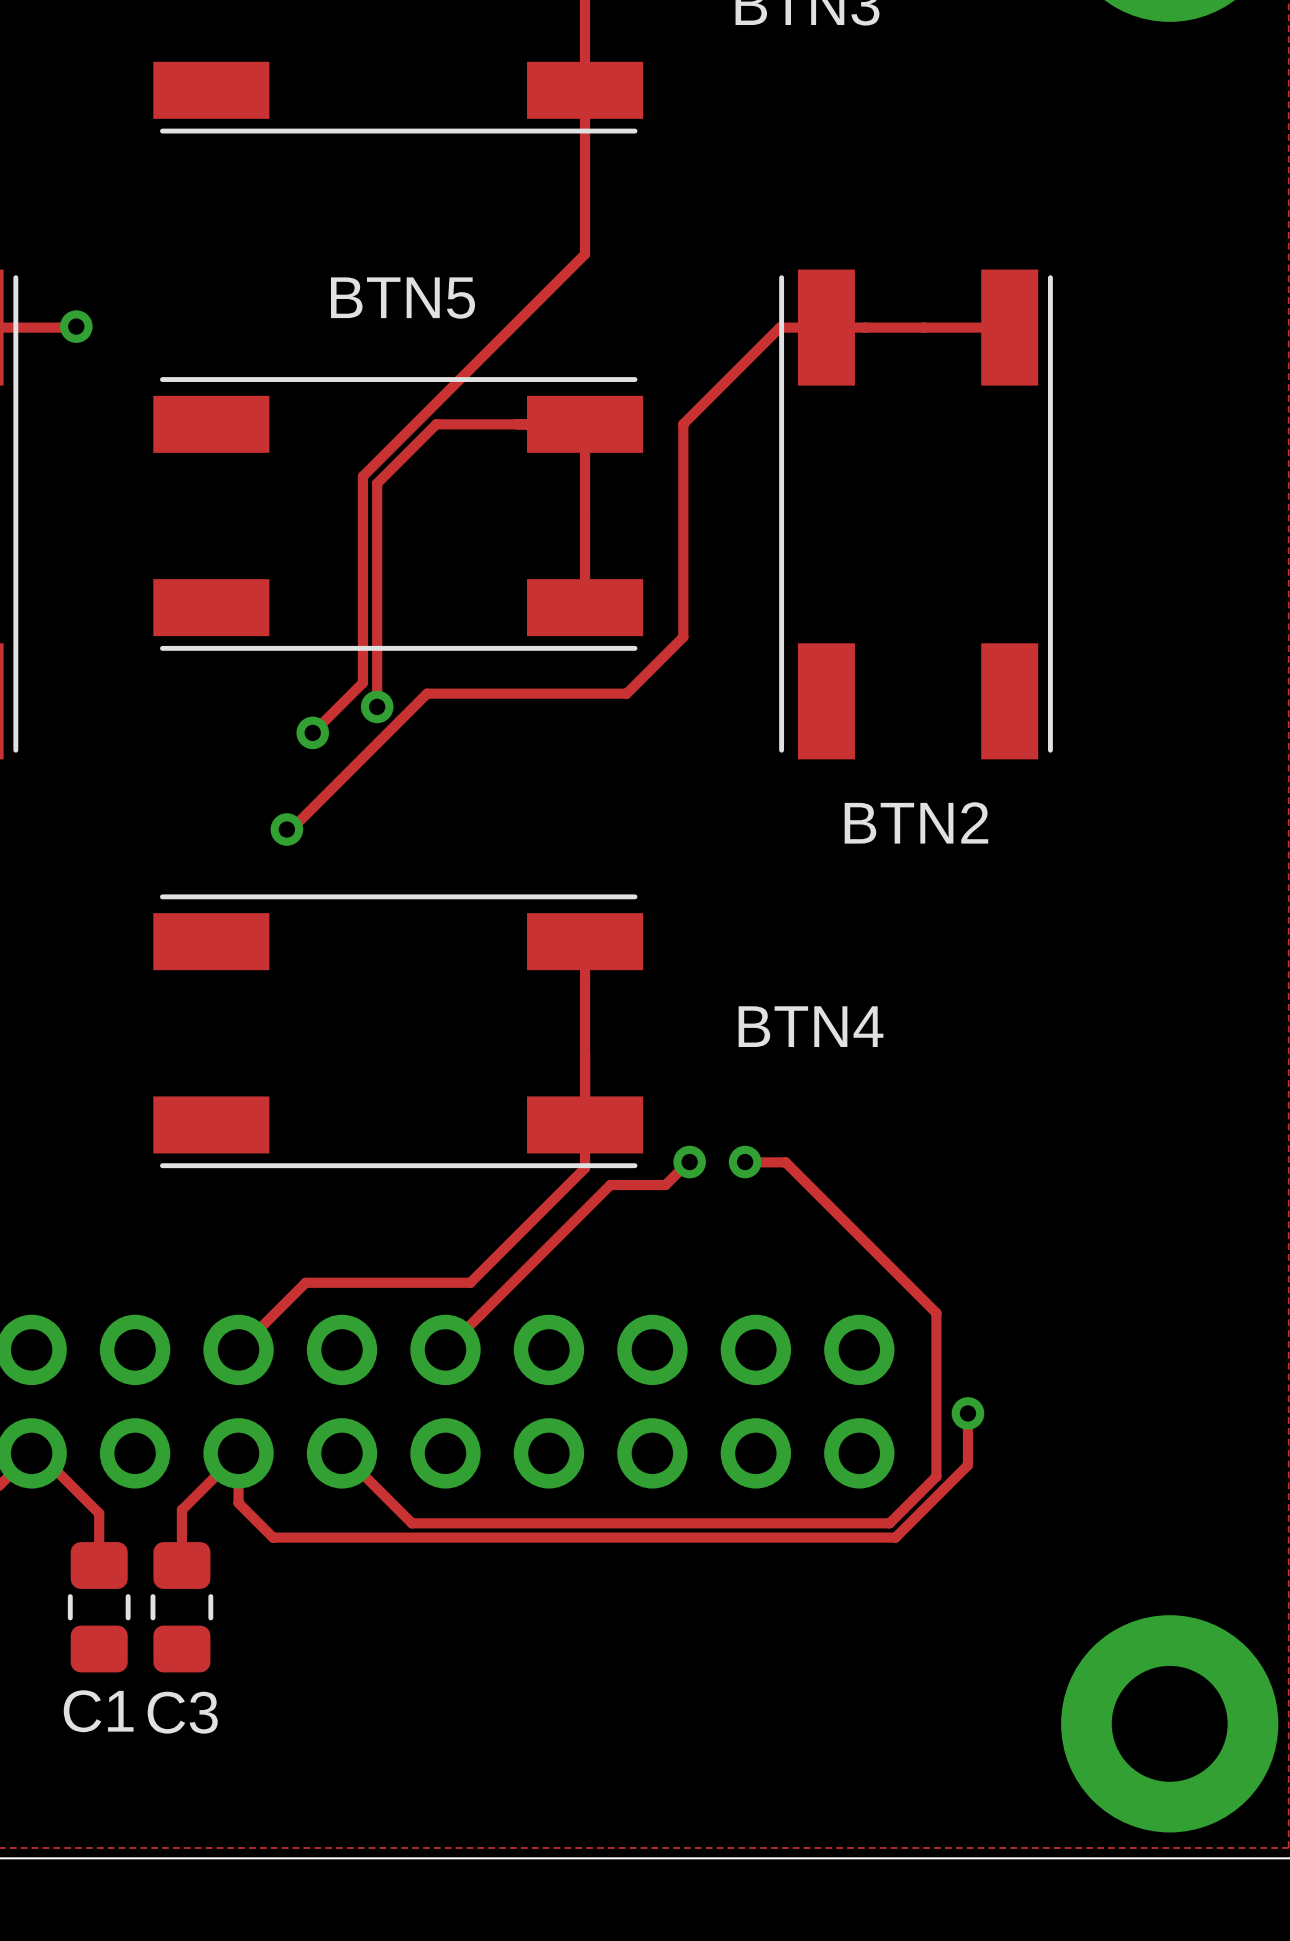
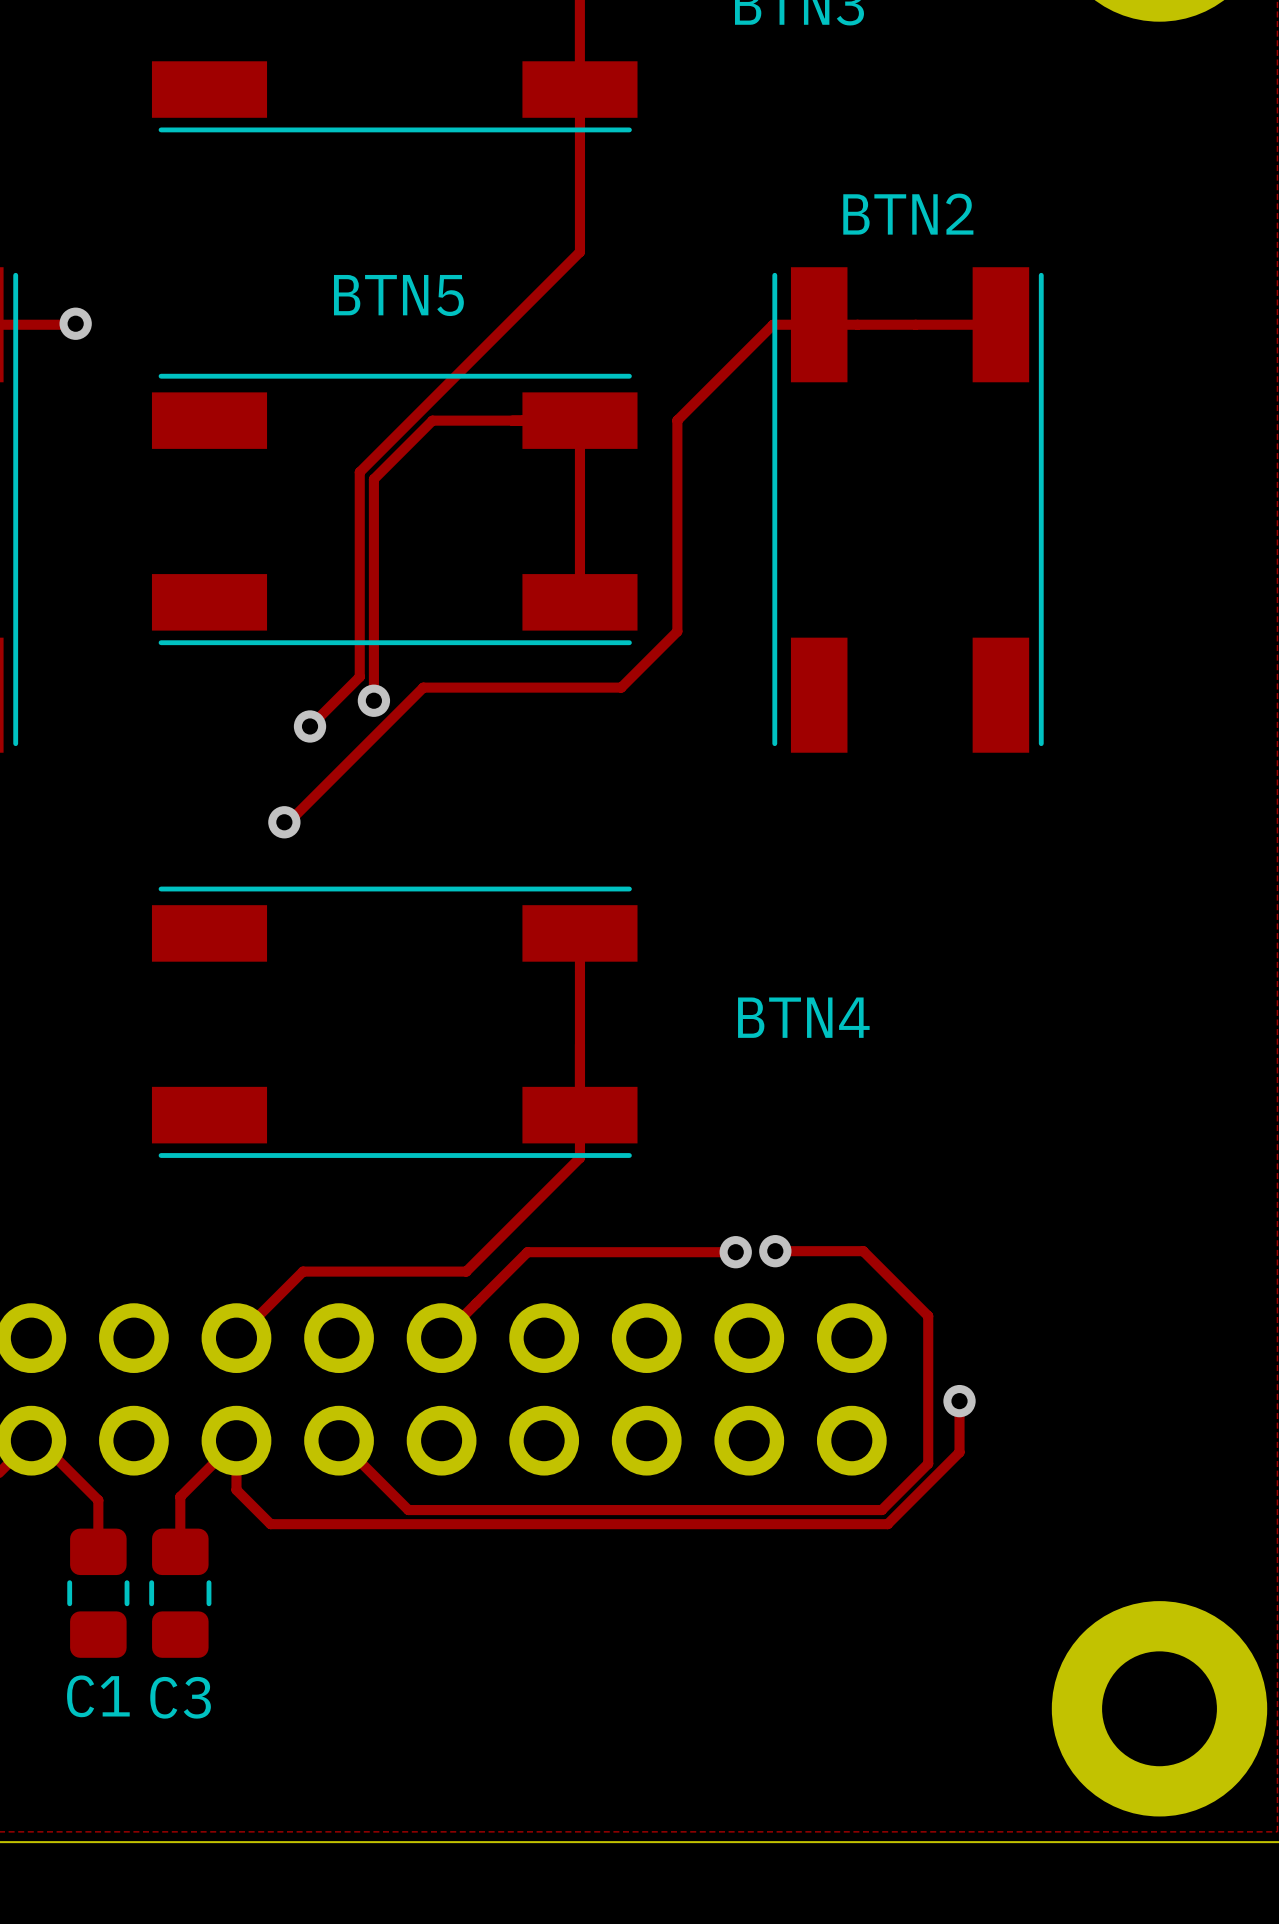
BTN2 name position: BTN2 (916, 822) -> BTN2 (908, 214)
track: (740, 1154) (747, 1162) (785, 1162) (936, 1313) (936, 1327) -> (775, 1251) (863, 1251) (928, 1316)
track: (689, 1161) (665, 1185) (610, 1185) (532, 1263) -> (735, 1252) (527, 1252)
via: (689, 1162) -> none
via: (745, 1162) -> none
via: none -> (775, 1251)
via: none -> (735, 1252)

